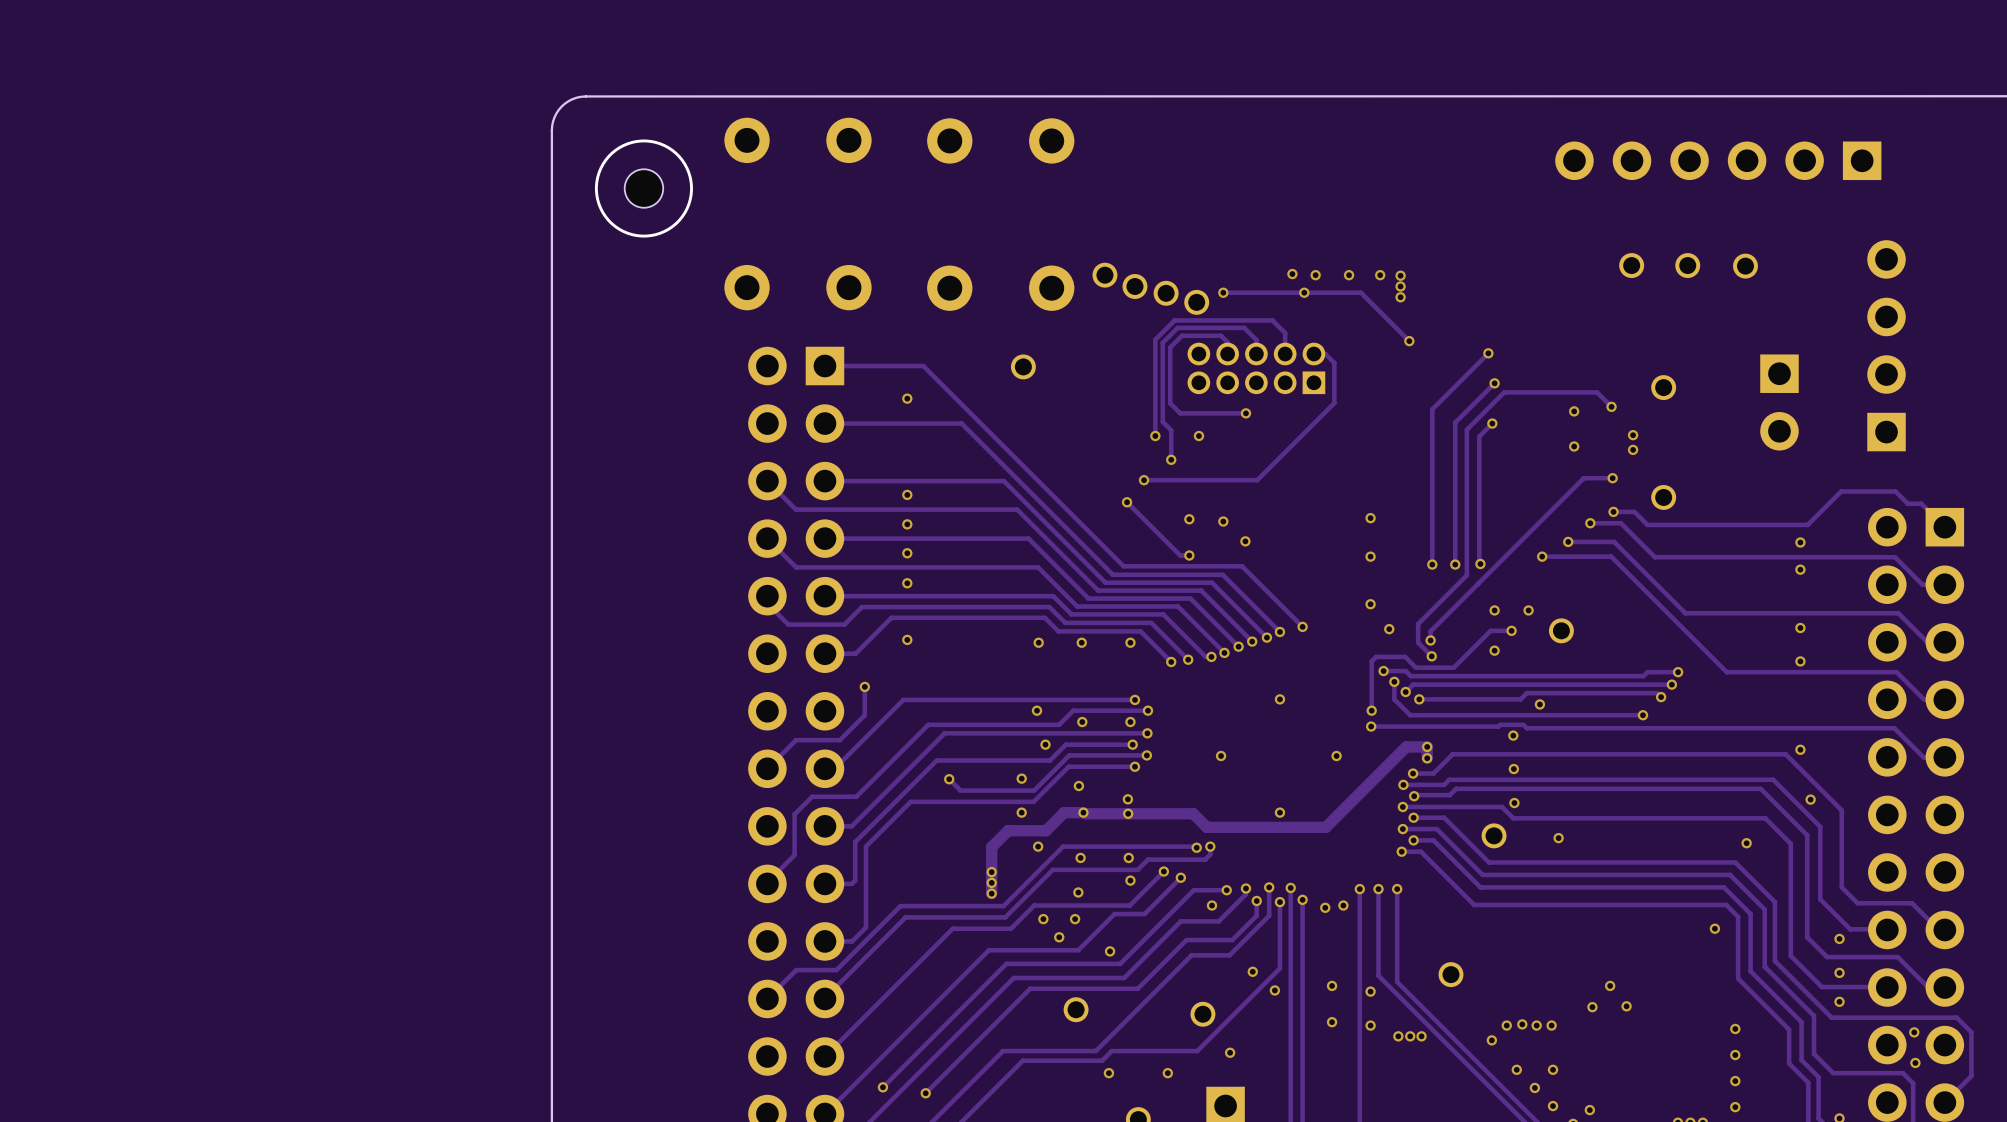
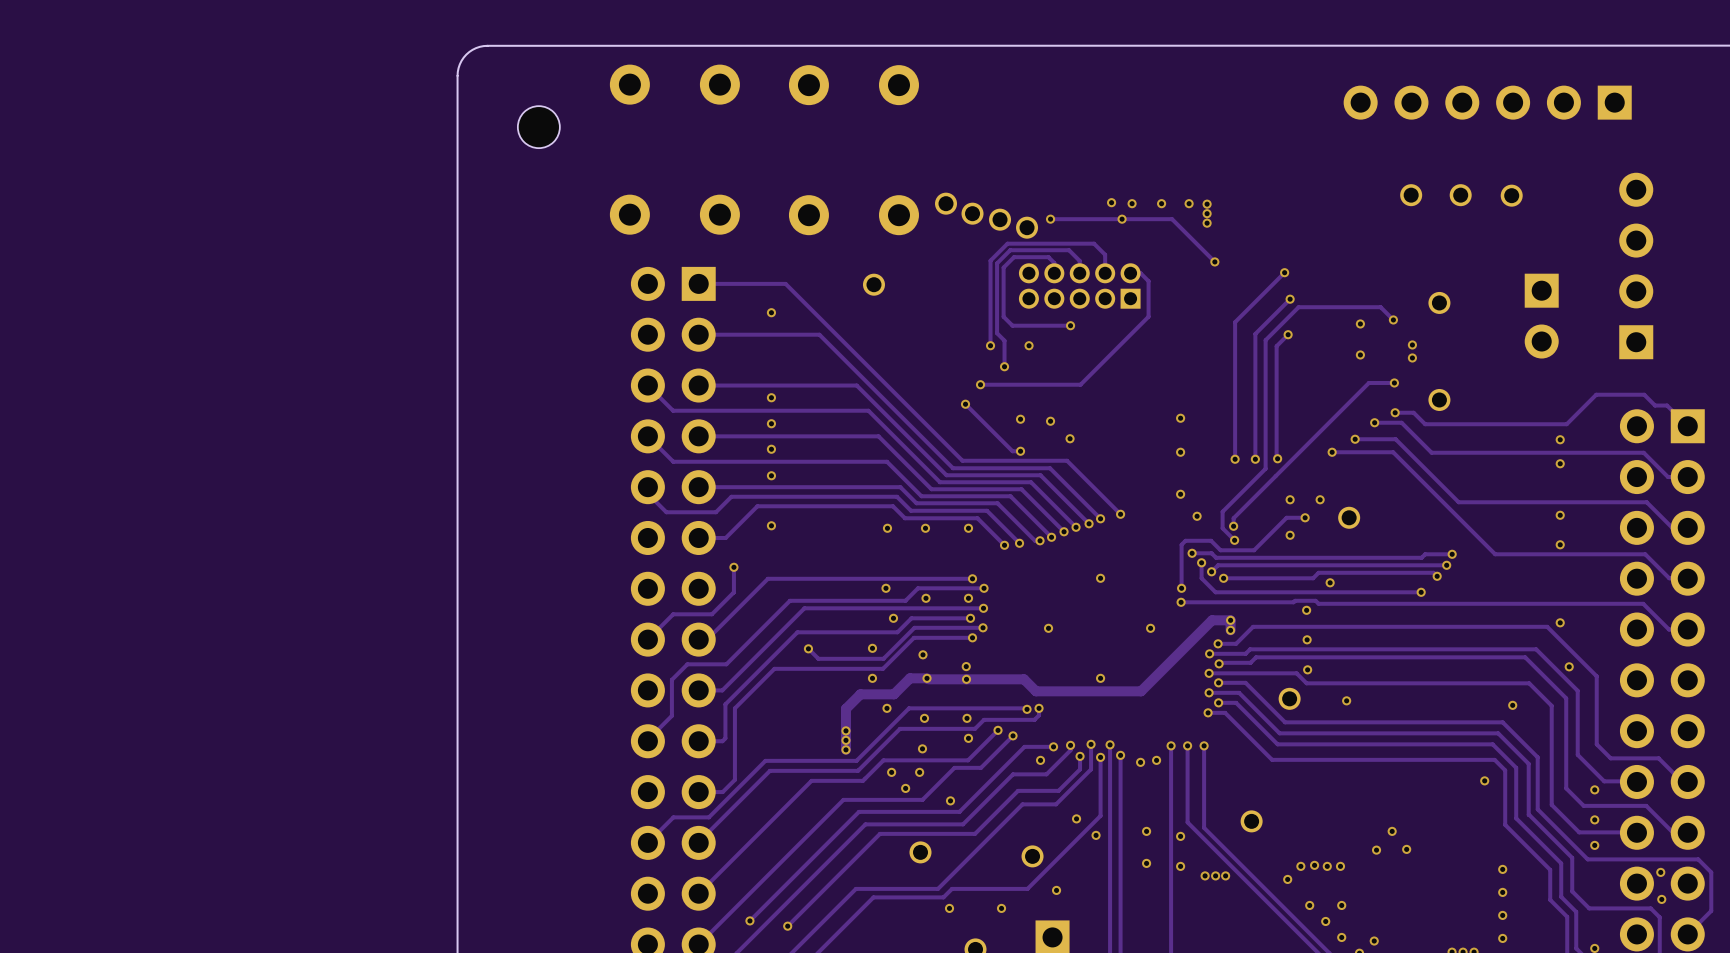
part footprint: [594, 139, 693, 238] -> [517, 106, 560, 149]

